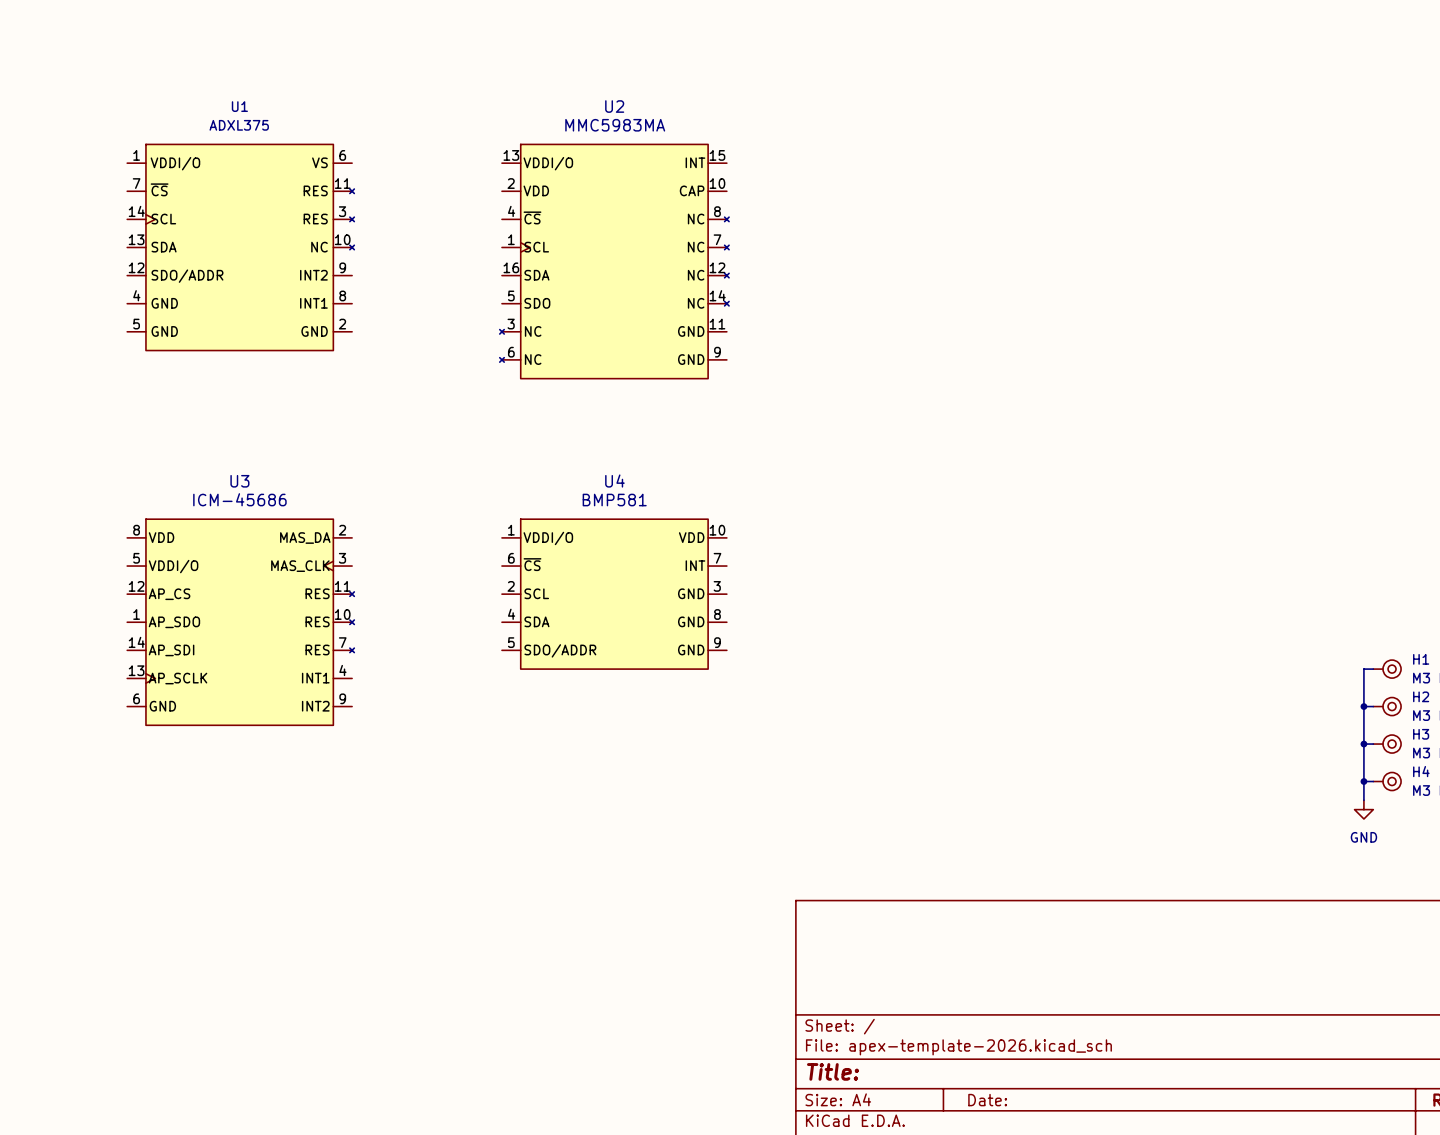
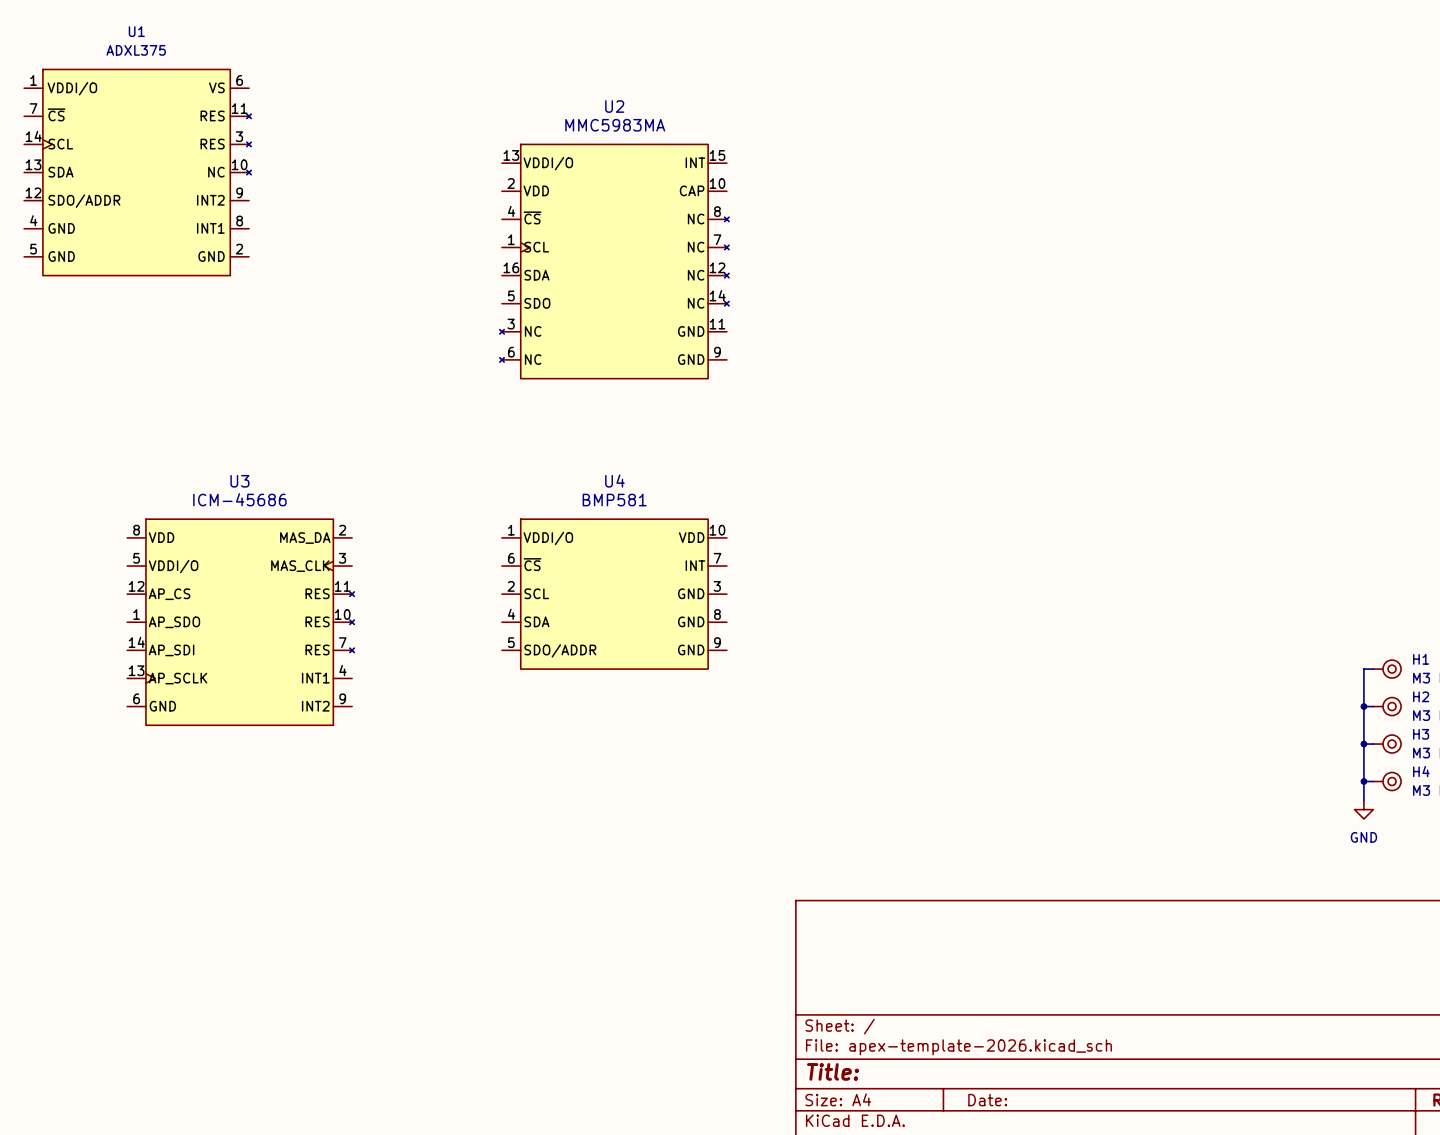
U1 position: (240, 247) -> (137, 172)

